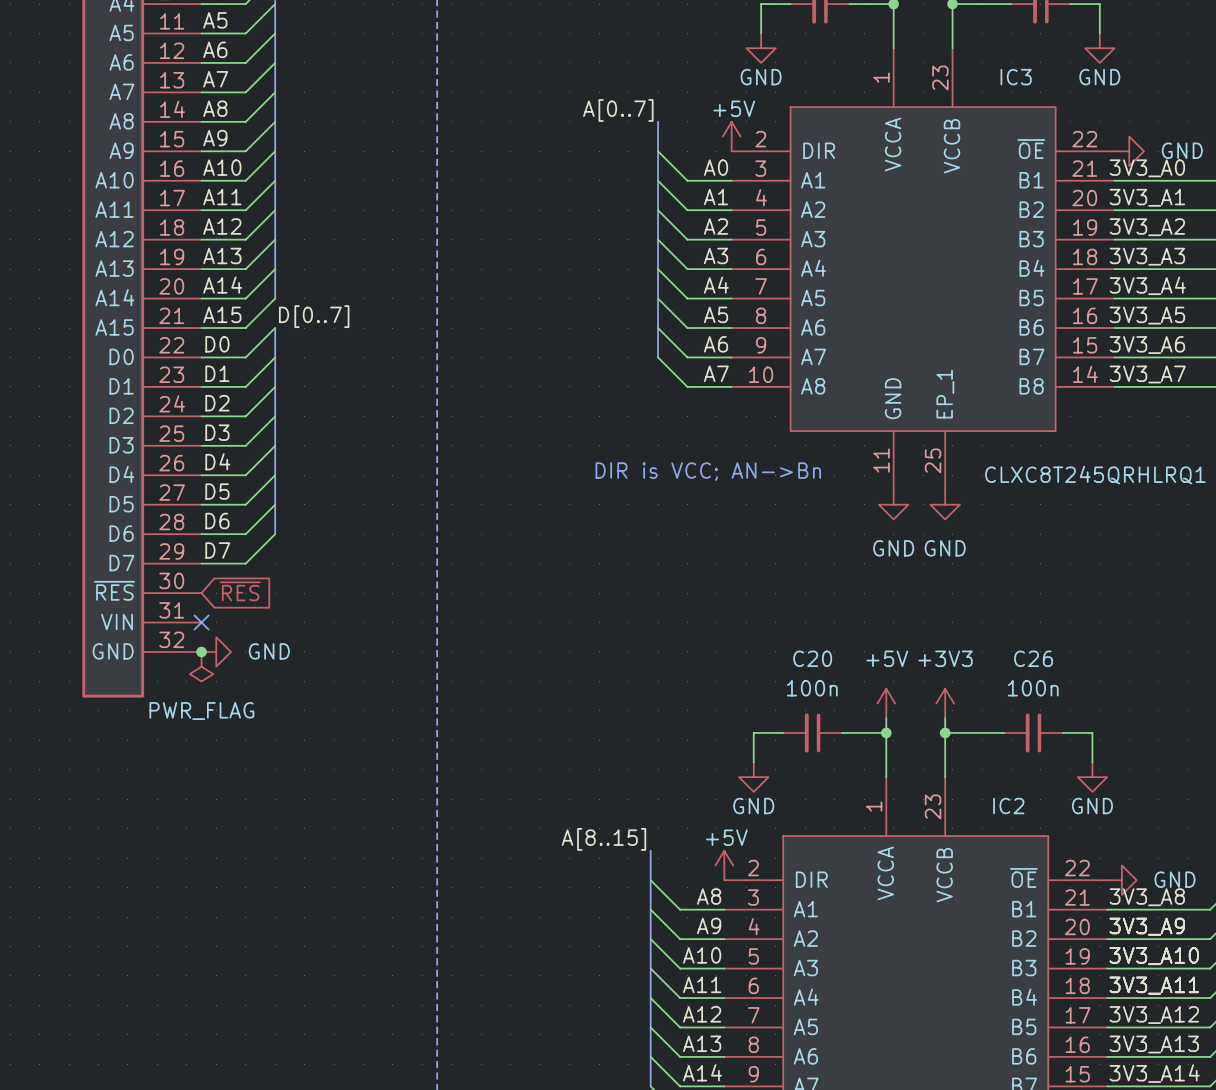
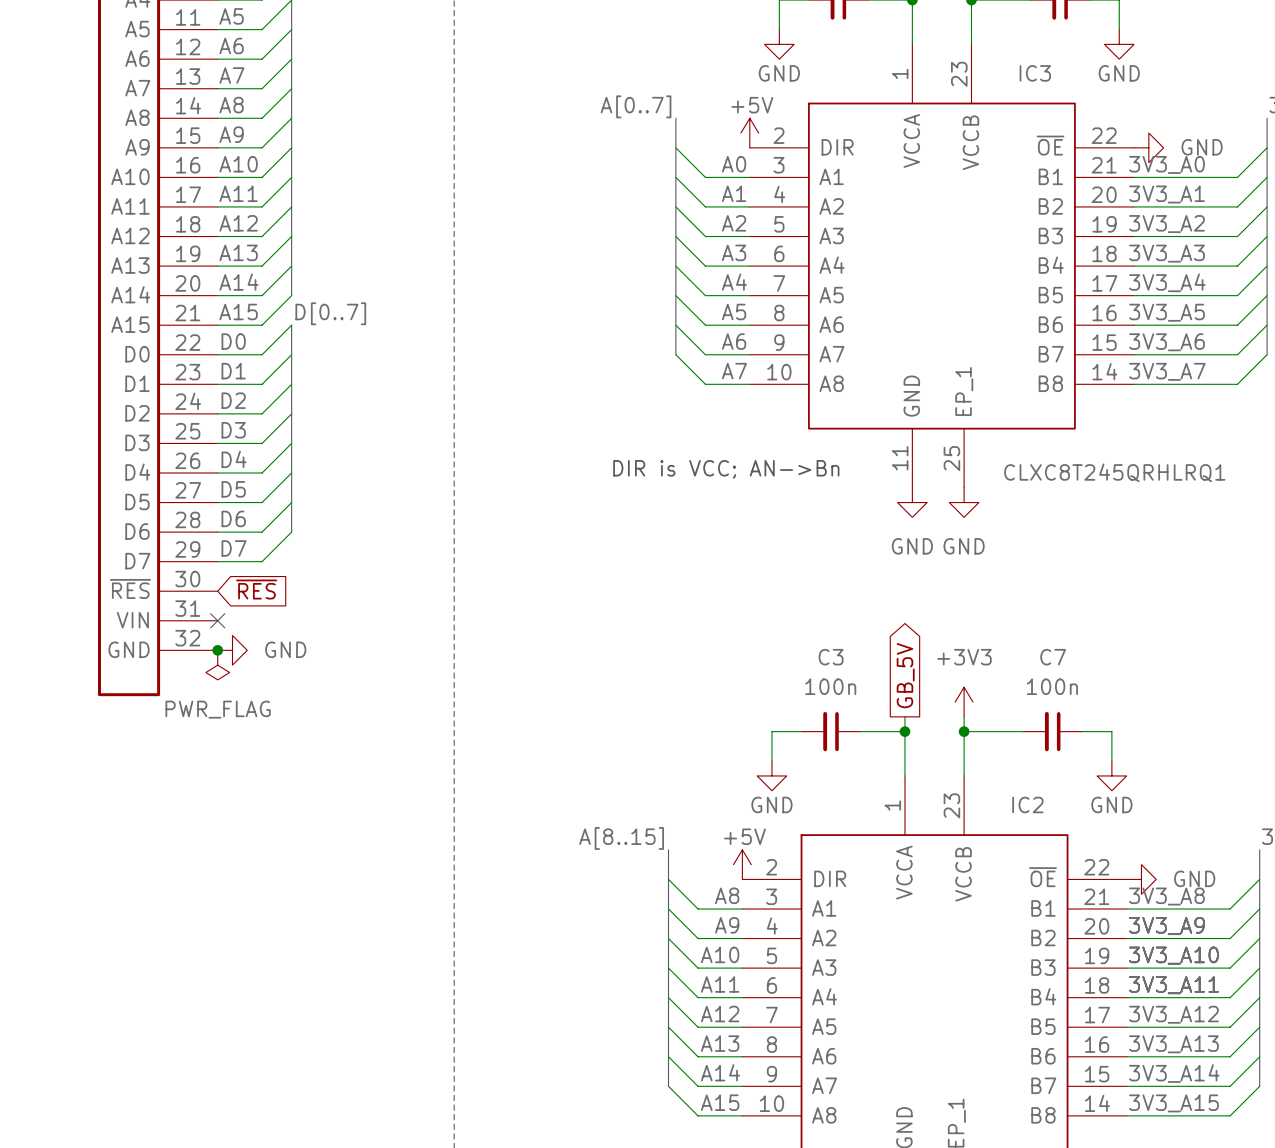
C20 name: C20 (812, 658) -> C3 (831, 657)
C26 name: C26 (1033, 658) -> C7 (1053, 657)
global label: none -> GB_5V (905, 675)
power symbol: +5V (886, 703) -> none

